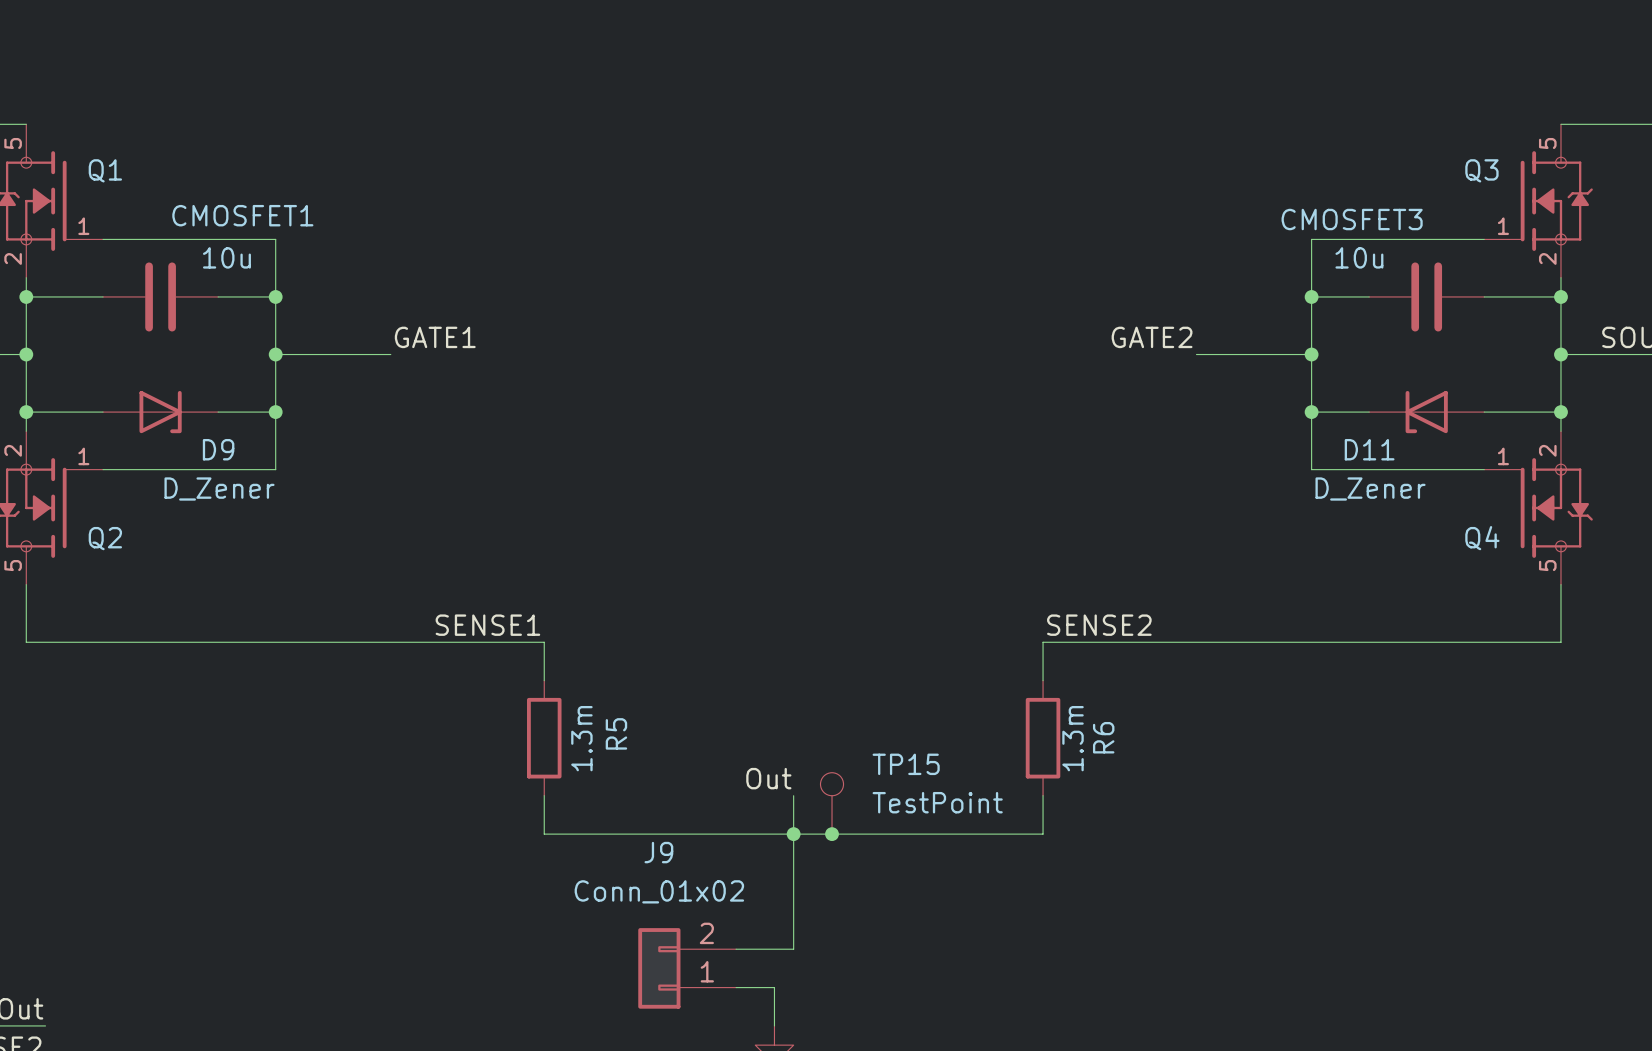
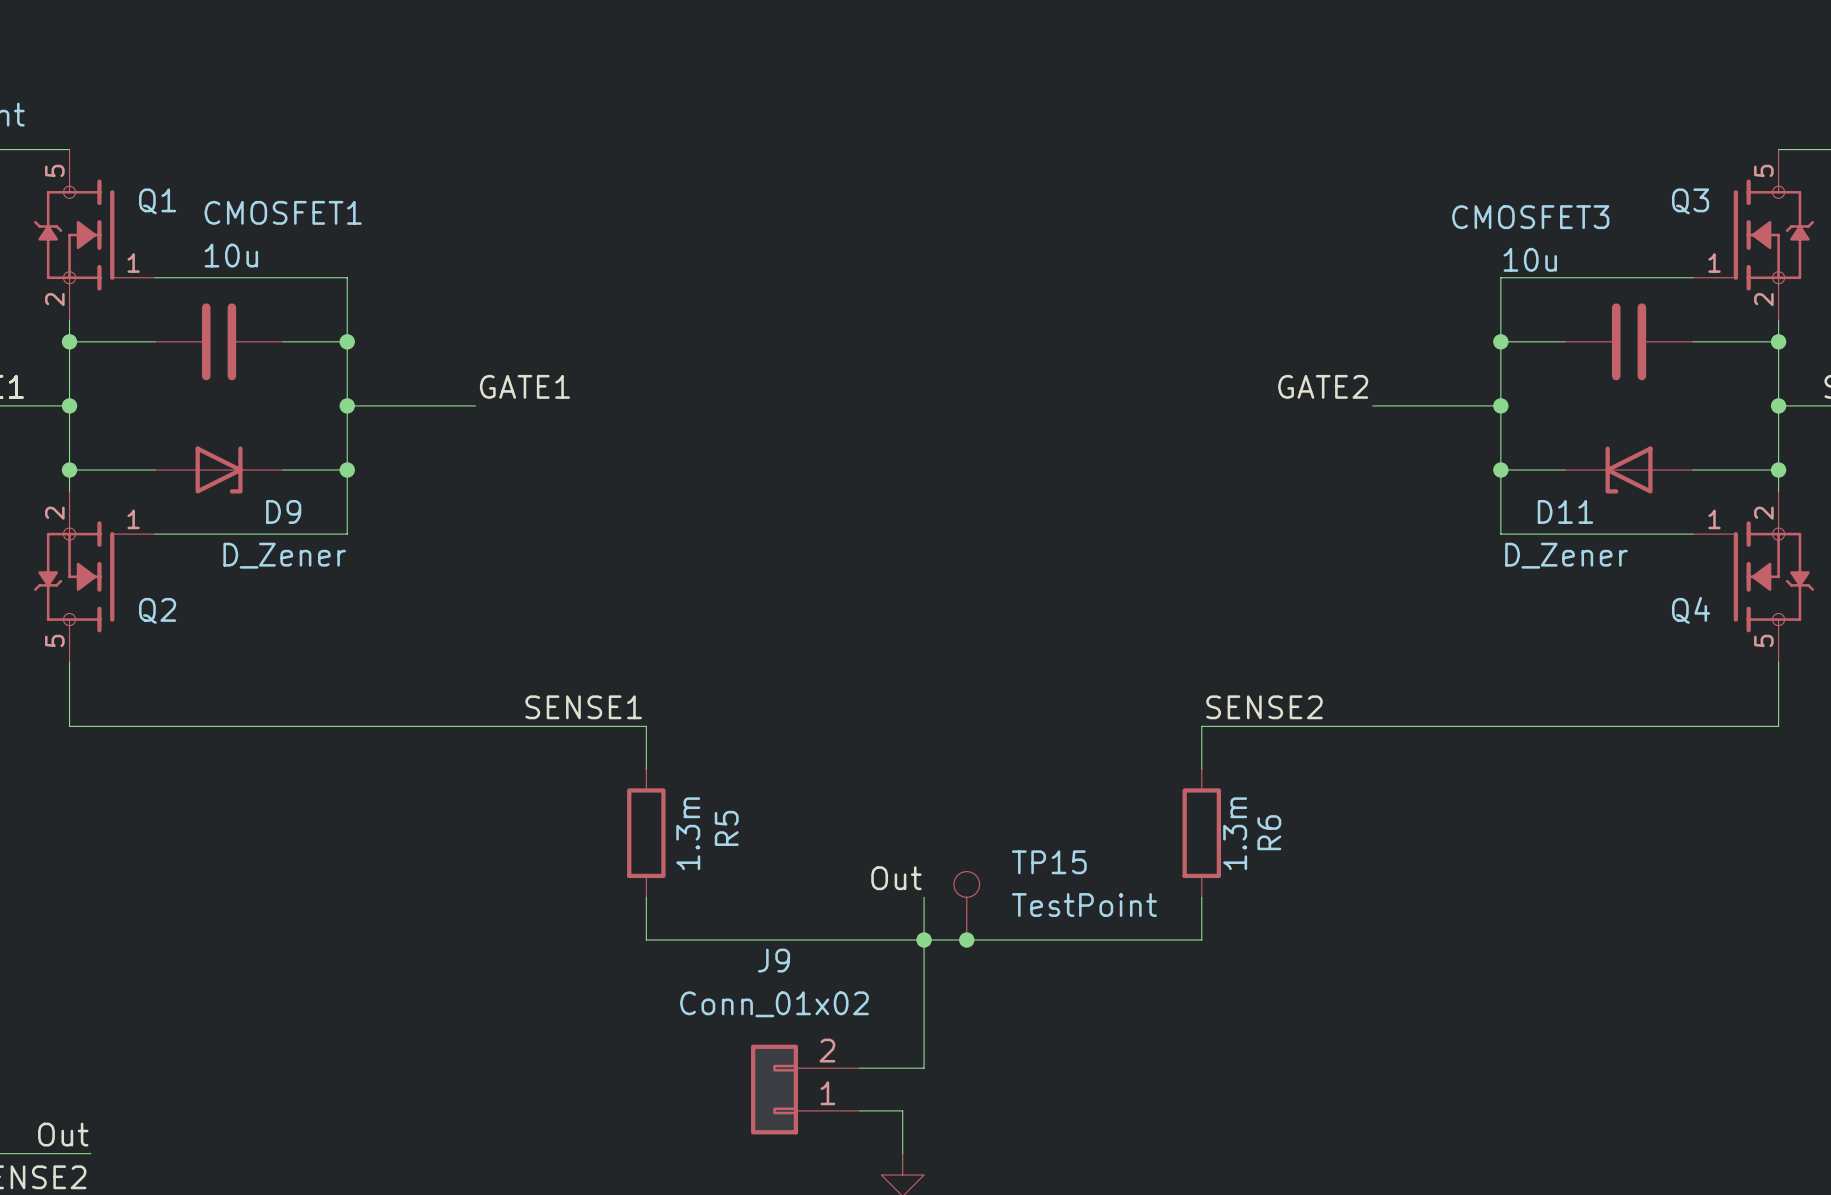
CMOSFET1 name position: CMOSFET1 (242, 215) -> CMOSFET1 (283, 212)
CMOSFET3 name position: CMOSFET3 (1352, 219) -> CMOSFET3 (1530, 217)
CMOSFET1 value position: 10u (226, 257) -> 10u (231, 255)
CMOSFET3 value position: 10u (1359, 257) -> 10u (1530, 259)

